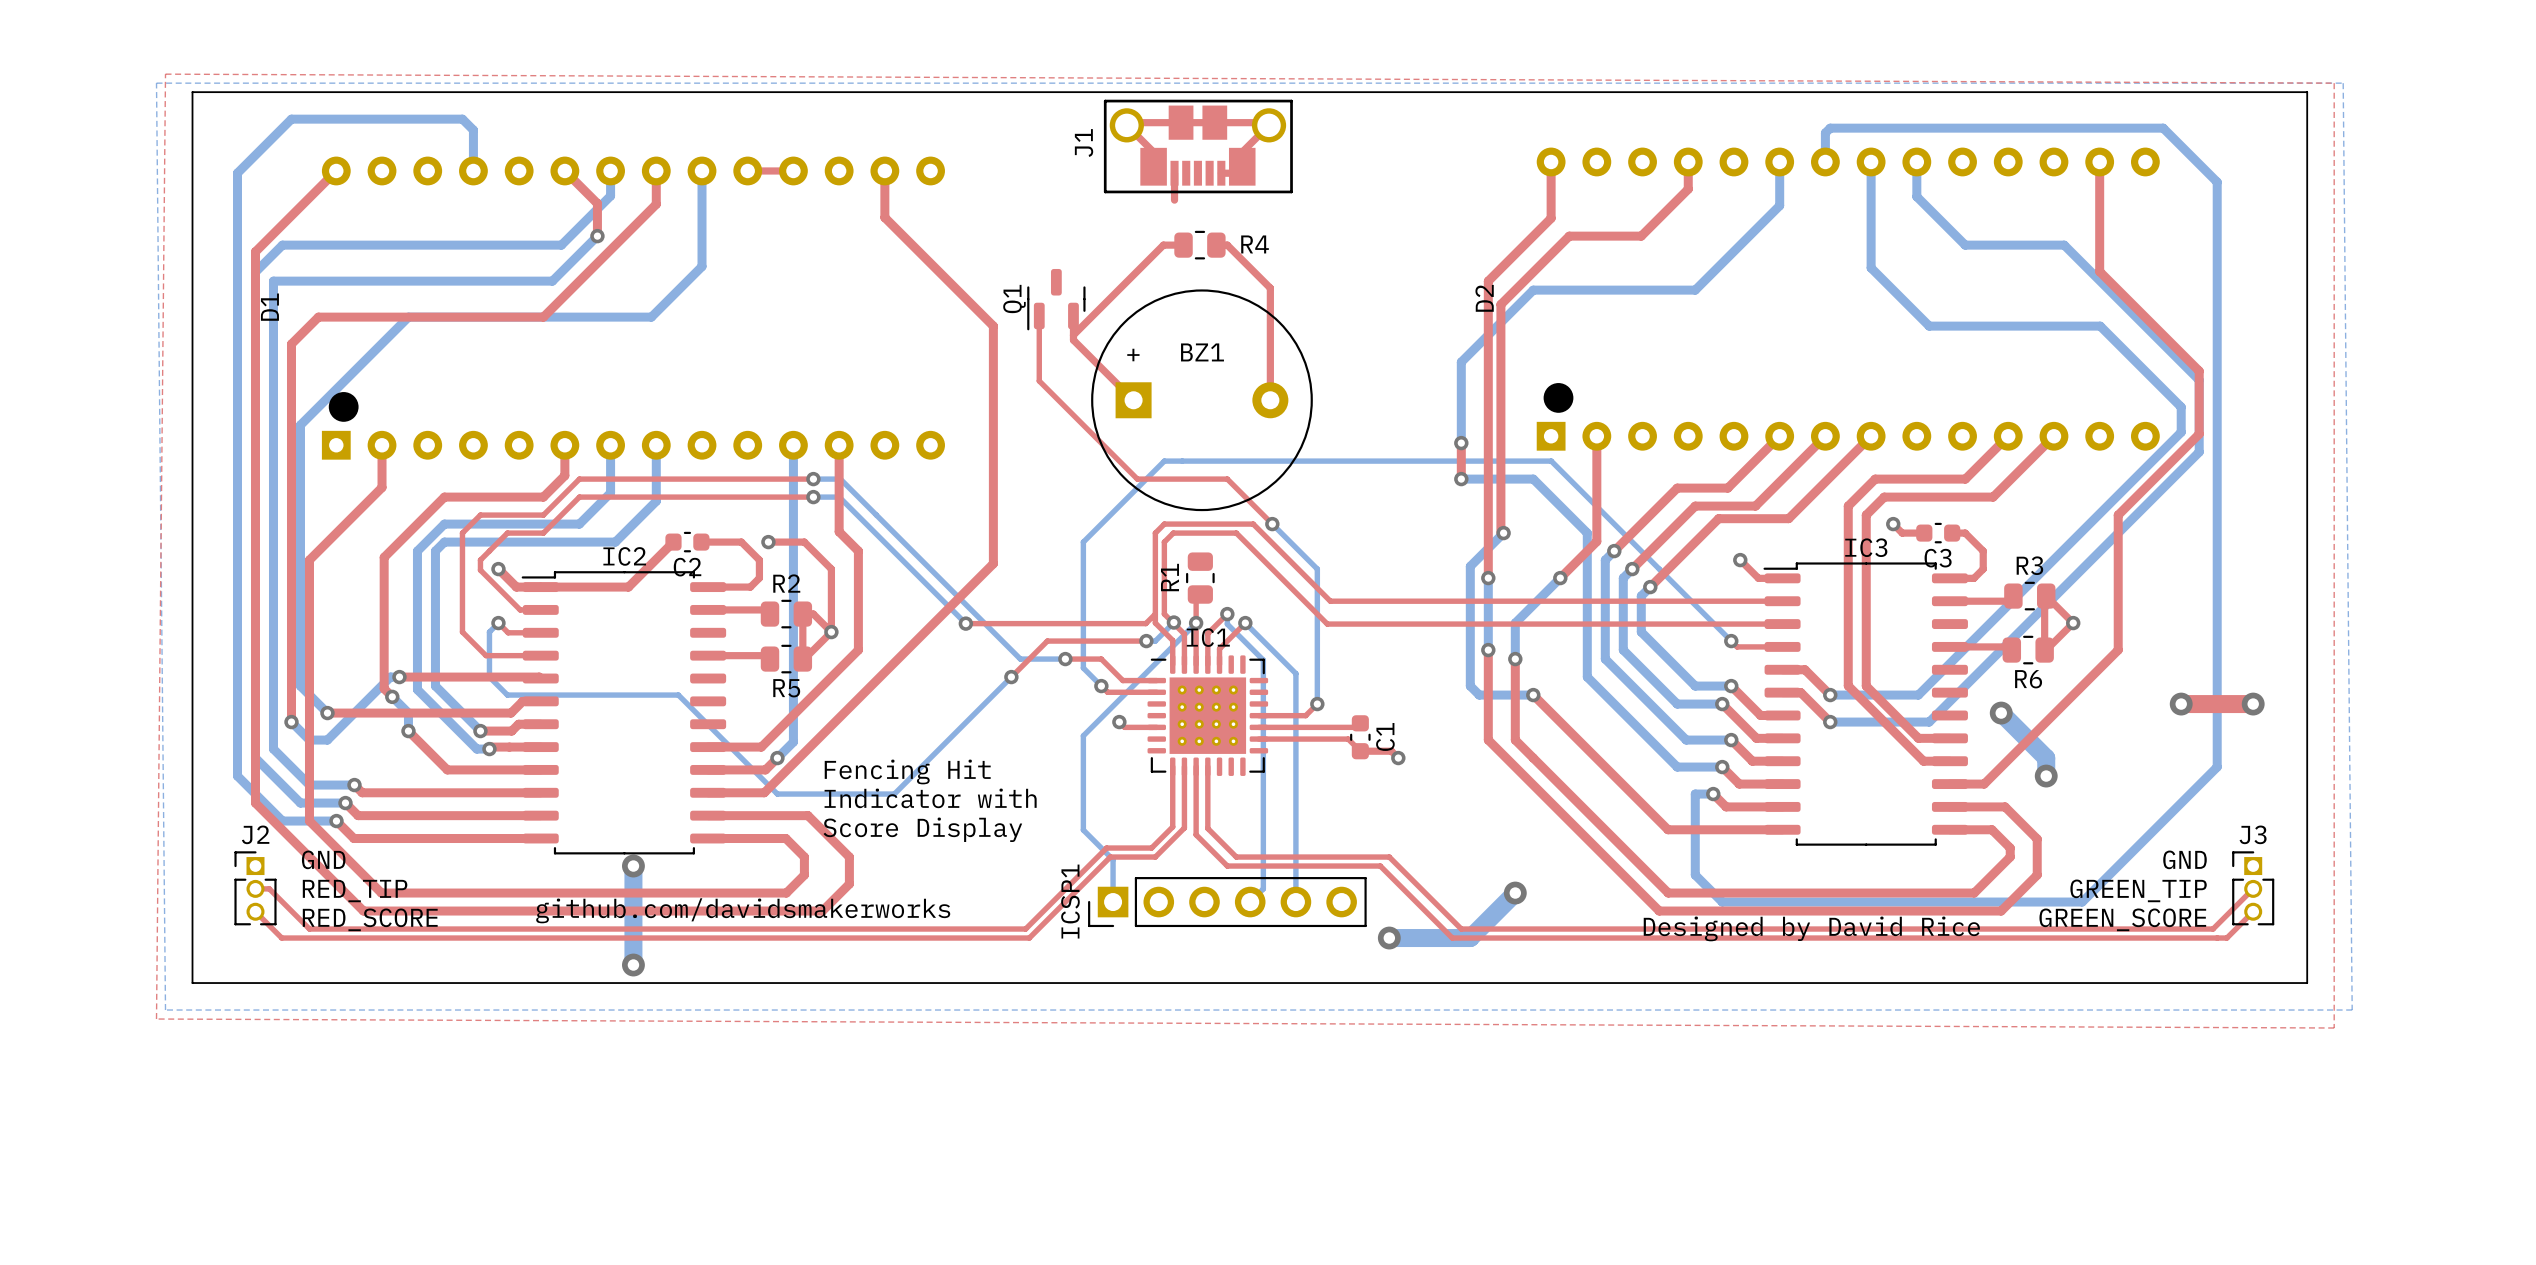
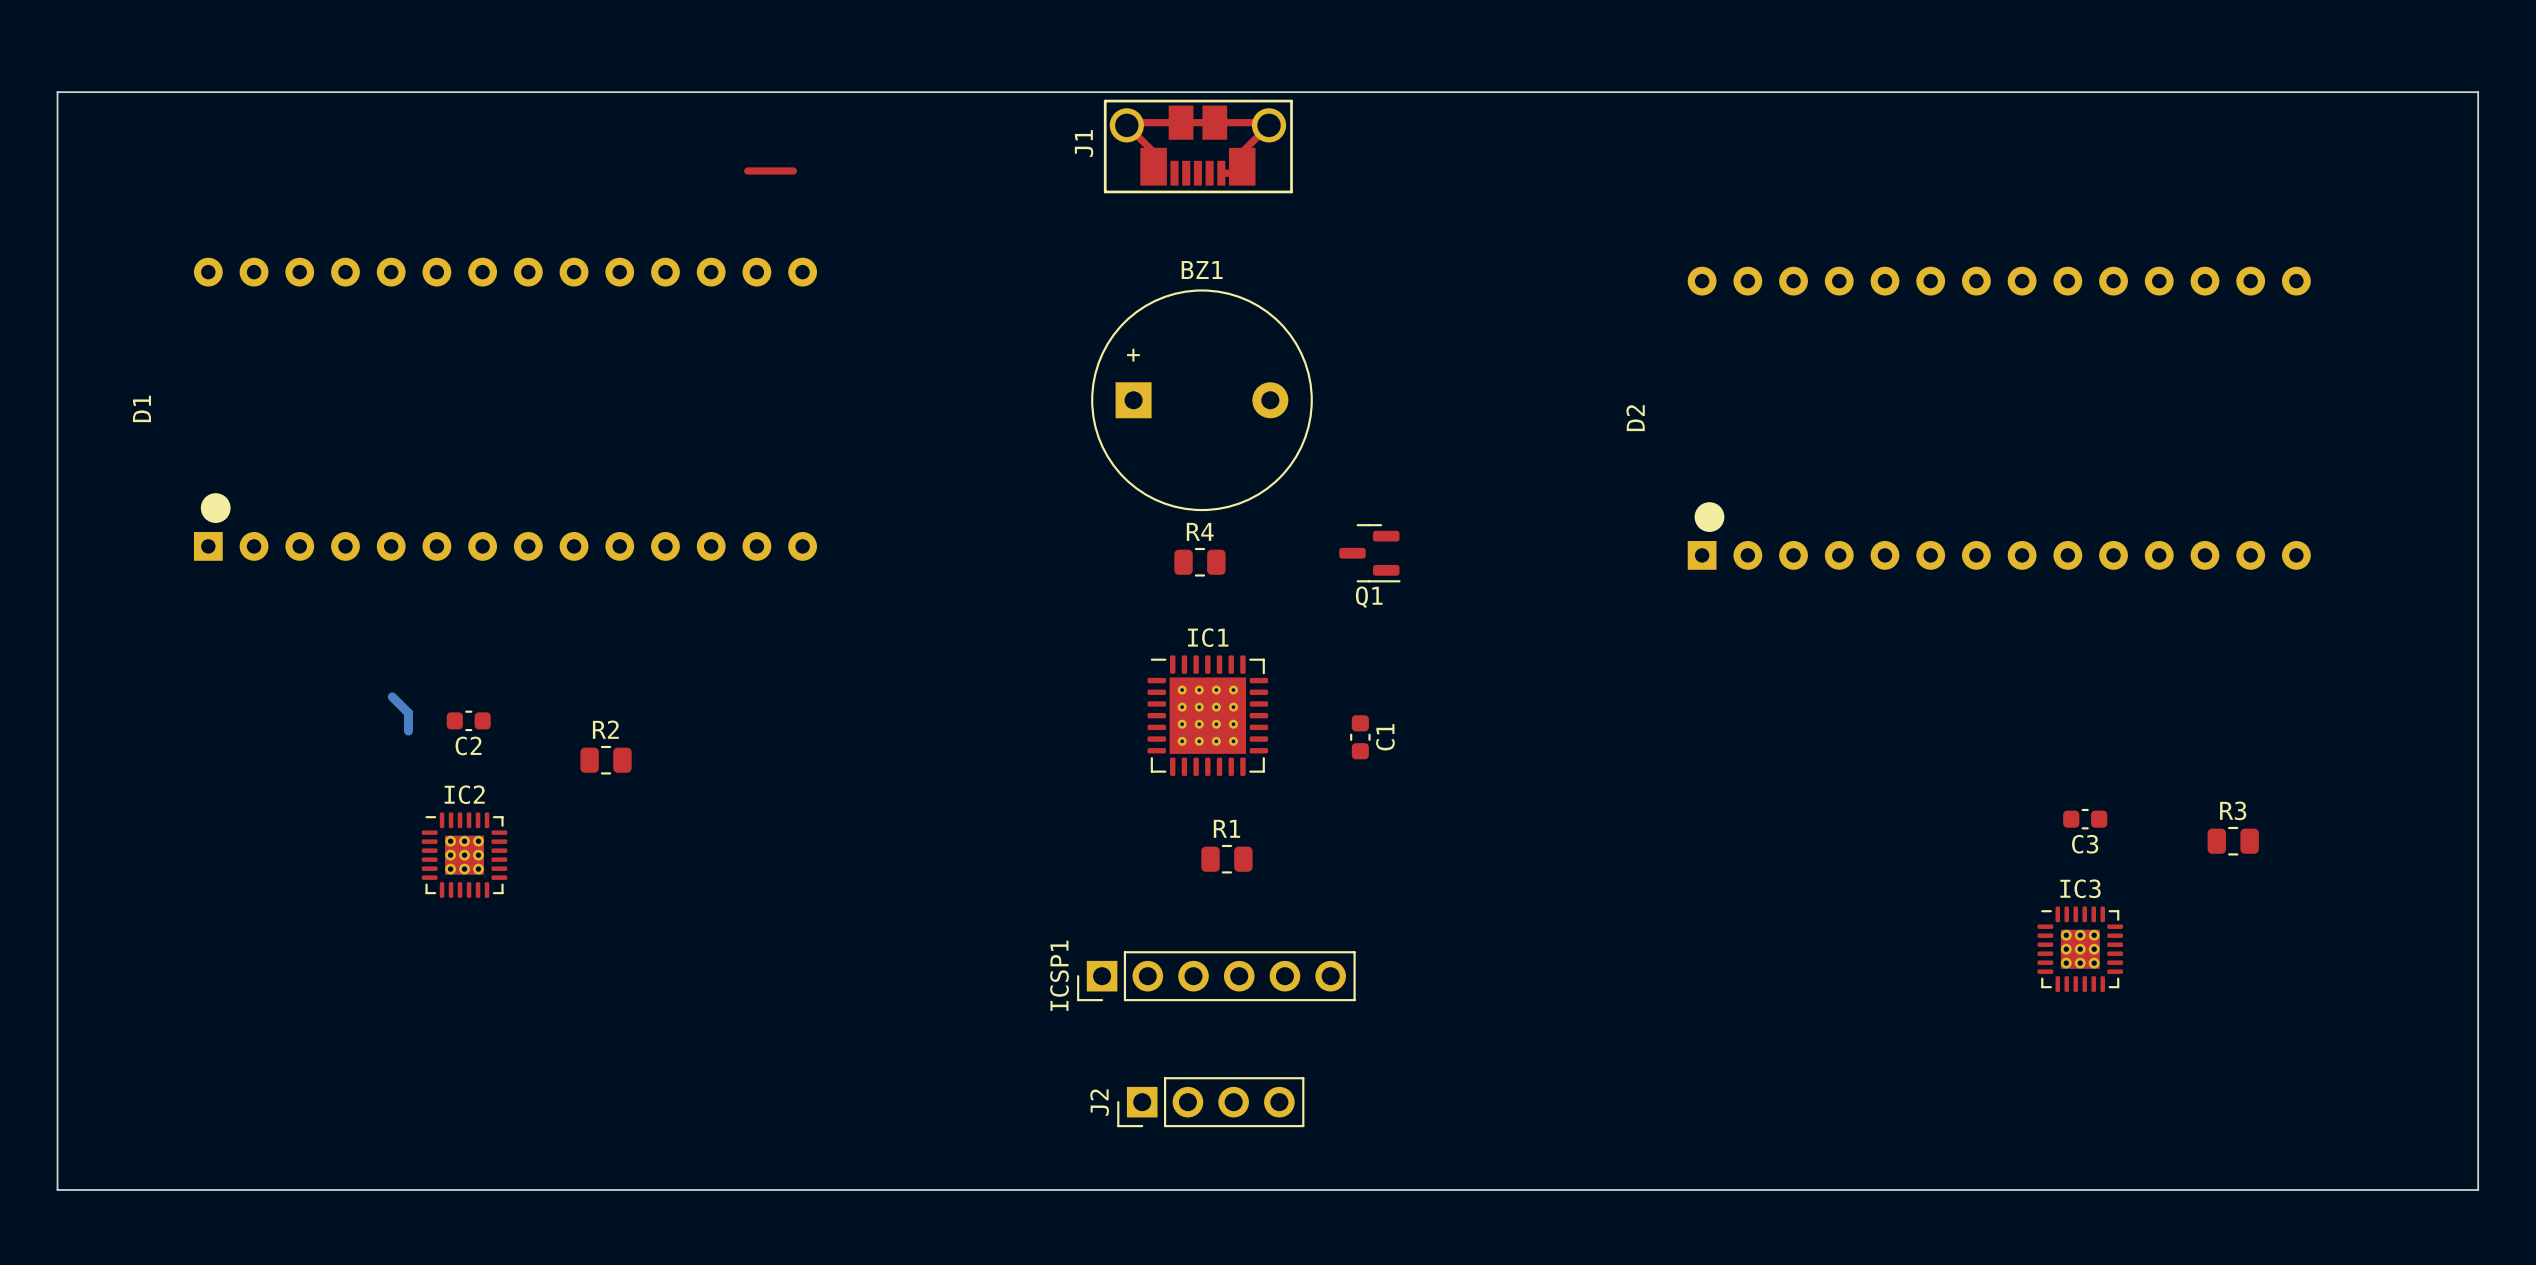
top zone outline: (165, 74) (156, 1019) (2334, 1028) (2334, 83) (165, 74) -> none
bottom zone outline: (156, 83) (2343, 83) (2352, 1010) (165, 1010) (156, 83) -> none
board edge: (192, 92) (192, 983) (2307, 983) (2307, 92) -> (192, 92) (57, 92) (57, 1189) (2478, 1189) (2478, 92) (2307, 92)
top track: (1551, 161) (1551, 218) (1488, 281) (1488, 578) -> none
top track: (1688, 161) (1688, 189) (1641, 236) (1569, 236) (1500, 304) (1500, 533) -> none
bottom track: (1779, 161) (1779, 205) (1695, 290) (1533, 290) (1461, 362) (1461, 443) -> none
bottom track: (1825, 161) (1825, 133) (1830, 128) (2163, 128) (2217, 182) (2217, 767) (2082, 902) (1722, 902) (1695, 875) (1695, 794) (1713, 794) -> none
bottom track: (1871, 161) (1871, 267) (1929, 326) (2100, 326) (2181, 407) (2181, 432) (1918, 695) (1830, 695) -> none
bottom track: (1916, 161) (1916, 196) (1965, 245) (2064, 245) (2199, 380) (2199, 452) (1929, 722) (1830, 722) -> none
top track: (2099, 161) (2099, 271) (2199, 371) (2199, 434) (2118, 515) (2118, 650) (1984, 784) (1949, 784) -> none
top track: (336, 170) (255, 251) (255, 803) (363, 911) (822, 911) (849, 884) (849, 857) (808, 815) (708, 815) -> none
bottom track: (473, 170) (473, 130) (462, 119) (291, 119) (237, 173) (237, 776) (282, 821) (336, 821) -> none
top track: (564, 170) (597, 203) (597, 236) -> none
bottom track: (610, 170) (610, 195) (561, 245) (282, 245) (255, 272) (255, 758) (300, 803) (345, 803) -> none
top track: (656, 170) (656, 204) (543, 317) (318, 317) (291, 344) (291, 722) -> none
bottom track: (702, 170) (702, 266) (651, 317) (408, 317) (300, 425) (300, 686) (327, 713) -> none
top track: (884, 170) (884, 217) (993, 326) (993, 563) (764, 792) (708, 792) -> none
top track: (1174, 173) (1174, 200) -> none
bottom track: (597, 236) (552, 281) (273, 281) (273, 749) (309, 785) (354, 785) -> none
via: (597, 236) -> none
R4 name position: R4 (1255, 244) -> R4 (1200, 531)
top track: (1183, 245) (1163, 245) (1073, 335) -> none
R4 position: (1199, 245) -> (1199, 562)
top track: (1216, 245) (1227, 245) (1270, 288) (1270, 400) -> none
Q1 rotation: 0° (1056, 299) -> 90° counterclockwise (1369, 553)
Q1 position: (1056, 299) -> (1369, 553)
D2 position: (1848, 299) -> (1999, 418)
D1 position: (633, 308) -> (505, 409)
top track: (1039, 315) (1039, 381) (1137, 479) (1227, 479) (1272, 524) -> none
top track: (1073, 315) (1073, 340) (1133, 400) -> none
BZ1 name position: BZ1 (1202, 352) -> BZ1 (1202, 270)
top track: (1596, 436) (1596, 541) (1560, 578) -> none
top track: (1779, 436) (1727, 488) (1677, 488) (1614, 551) -> none
top track: (1825, 436) (1755, 506) (1695, 506) (1632, 569) -> none
top track: (1871, 436) (1788, 518) (1718, 518) (1650, 587) -> none
top track: (2008, 436) (1965, 479) (1875, 479) (1848, 506) (1848, 685) (1923, 761) (1949, 761) -> none
top track: (2053, 436) (1993, 497) (1884, 497) (1866, 515) (1866, 686) (1918, 738) (1949, 738) -> none
top track: (1461, 443) (1461, 479) -> none
via: (1461, 443) -> none
top track: (382, 445) (382, 487) (309, 560) (309, 821) (381, 893) (786, 893) (804, 875) (804, 857) (785, 838) (708, 838) -> none
top track: (564, 445) (564, 475) (543, 497) (444, 497) (384, 557) (384, 688) (392, 696) -> none
bottom track: (610, 445) (610, 492) (579, 524) (444, 524) (417, 551) (417, 689) (476, 749) (489, 749) -> none
bottom track: (656, 445) (656, 501) (615, 542) (444, 542) (435, 551) (435, 686) (480, 731) -> none
bottom track: (793, 445) (793, 742) (777, 758) -> none
top track: (839, 445) (839, 531) (858, 551) (858, 650) (761, 747) (708, 747) -> none
top track: (813, 479) (579, 479) (543, 515) (480, 515) (462, 533) (462, 632) (486, 655) (540, 655) -> none
bottom track: (813, 479) (840, 479) (1020, 659) (1065, 659) -> none
via: (813, 479) -> none
bottom track: (1461, 479) (1533, 479) (1587, 533) (1587, 677) (1677, 767) (1722, 767) -> none
via: (1461, 479) -> none
top track: (813, 497) (579, 497) (543, 533) (507, 533) (480, 560) (480, 570) (520, 609) (540, 609) -> none
bottom track: (813, 497) (839, 497) (965, 623) -> none
via: (813, 497) -> none
bottom track: (1272, 524) (1317, 569) (1317, 704) -> none
via: (1272, 524) -> none
top track: (1893, 524) (1902, 533) (1924, 533) -> none
via: (1893, 524) -> none
bottom track: (1503, 533) (1470, 566) (1470, 686) (1479, 695) (1533, 695) -> none
via: (1503, 533) -> none
C3 position: (1938, 533) -> (2085, 819)
top track: (1952, 533) (1965, 533) (1983, 551) (1983, 569) (1973, 578) (1949, 578) -> none
top track: (673, 542) (628, 587) (516, 587) (498, 569) -> none
C2 position: (687, 542) -> (468, 720)
top track: (701, 542) (741, 542) (759, 560) (759, 578) (750, 587) (708, 587) -> none
top track: (768, 542) (804, 542) (831, 569) (831, 632) -> none
via: (768, 542) -> none
IC3 name position: IC3 (1866, 547) -> IC3 (2080, 888)
bottom track: (1614, 551) (1605, 560) (1605, 659) (1686, 740) (1731, 740) -> none
via: (1614, 551) -> none
IC2 name position: IC2 (624, 556) -> IC2 (464, 794)
top track: (1740, 560) (1758, 578) (1782, 578) -> none
via: (1740, 560) -> none
IC3 footprint: [1763, 562, 1968, 846] -> [2037, 906, 2123, 992]
via: (498, 569) -> none
bottom track: (1632, 569) (1623, 578) (1623, 650) (1677, 704) (1722, 704) -> none
via: (1632, 569) -> none
IC2 footprint: [521, 571, 727, 855] -> [421, 812, 508, 898]
R1 rotation: 0° (1200, 578) -> 90° clockwise (1226, 859)
R1 position: (1200, 578) -> (1226, 859)
bottom track: (1488, 578) (1488, 650) -> none
via: (1488, 578) -> none
bottom track: (1560, 578) (1515, 623) (1515, 659) -> none
via: (1560, 578) -> none
bottom track: (1650, 587) (1641, 596) (1641, 632) (1695, 686) (1731, 686) -> none
via: (1650, 587) -> none
top track: (1200, 594) (1196, 598) (1196, 664) -> none
top track: (2013, 596) (2008, 601) (1949, 601) -> none
R3 position: (2029, 596) -> (2233, 841)
top track: (2046, 596) (2044, 597) (2044, 650) (2073, 623) (2046, 596) -> none
top track: (1782, 601) (1330, 601) (1253, 524) (1164, 524) (1155, 533) (1155, 623) (1172, 640) (1172, 664) -> none
top track: (708, 609) (765, 609) (769, 614) -> none
R2 position: (786, 614) -> (606, 760)
top track: (1155, 614) (1145, 623) (965, 623) -> none
top track: (1227, 614) (1207, 633) (1207, 664) -> none
bottom track: (1227, 614) (1227, 624) (1263, 660) (1263, 888) (1250, 902) -> none
via: (1227, 614) -> none
bottom track: (1173, 622) (1155, 641) (1146, 641) -> none
via: (1173, 622) -> none
top track: (498, 623) (508, 632) (540, 632) -> none
bottom track: (498, 623) (489, 632) (489, 677) (507, 695) (678, 695) (777, 794) (894, 794) (1011, 677) -> none
via: (498, 623) -> none
via: (965, 623) -> none
bottom track: (1196, 623) (1083, 735) (1083, 830) (1113, 859) (1113, 902) -> none
via: (1196, 623) -> none
top track: (1245, 623) (1219, 648) (1219, 664) -> none
bottom track: (1245, 623) (1295, 673) (1295, 902) -> none
via: (1245, 623) -> none
via: (2073, 623) -> none
top track: (1782, 624) (1327, 624) (1236, 533) (1173, 533) (1164, 542) (1164, 614) (1184, 634) (1184, 664) -> none
top track: (831, 632) (804, 659) (802, 659) (802, 614) (813, 614) (831, 632) -> none
via: (831, 632) -> none
top track: (1146, 641) (1047, 641) (1011, 677) -> none
via: (1146, 641) -> none
top track: (1731, 641) (1737, 646) (1782, 646) -> none
bottom track: (1731, 641) (1551, 461) (1164, 461) (1083, 542) (1083, 668) (1101, 686) -> none
via: (1731, 641) -> none
top track: (1949, 646) (2008, 646) (2011, 650) -> none
top track: (1488, 650) (1488, 740) (1659, 911) (2001, 911) (2037, 875) (2037, 839) (2005, 806) (1949, 806) -> none
via: (1488, 650) -> none
R6: (2028, 650) -> none
top track: (708, 655) (766, 655) (769, 659) -> none
R5: (786, 659) -> none
top track: (1065, 659) (1101, 659) (1122, 680) (1156, 680) -> none
via: (1065, 659) -> none
top track: (1515, 659) (1515, 740) (1668, 893) (1974, 893) (2010, 857) (2010, 848) (1991, 829) (1949, 829) -> none
via: (1515, 659) -> none
top track: (1782, 669) (1804, 669) (1830, 695) -> none
top track: (399, 677) (540, 678) -> none
bottom track: (399, 677) (390, 677) (327, 740) (309, 740) (291, 722) -> none
via: (399, 677) -> none
via: (1011, 677) -> none
top track: (1101, 686) (1107, 692) (1156, 692) -> none
via: (1101, 686) -> none
top track: (1731, 686) (1760, 715) (1782, 715) -> none
via: (1731, 686) -> none
top track: (1782, 692) (1800, 692) (1830, 722) -> none
top track: (1533, 695) (1668, 829) (1782, 829) -> none
via: (1533, 695) -> none
via: (1830, 695) -> none
via: (392, 696) -> none
top track: (540, 701) (522, 701) (511, 713) (327, 713) -> none
top track: (1317, 704) (1305, 715) (1258, 715) -> none
via: (1317, 704) -> none
top track: (1722, 704) (1756, 738) (1782, 738) -> none
via: (1722, 704) -> none
top track: (2181, 704) (2253, 704) -> none
via: (2181, 704) -> none
via: (2253, 704) -> none
via: (327, 713) -> none
bottom track: (2001, 713) (2046, 758) (2046, 776) -> none
via: (2001, 713) -> none
via: (291, 722) -> none
top track: (1119, 722) (1124, 727) (1156, 727) -> none
via: (1119, 722) -> none
via: (1830, 722) -> none
top track: (1360, 723) (1356, 727) (1258, 727) -> none
top track: (540, 724) (518, 724) (511, 731) (480, 731) -> none
top track: (408, 731) (447, 769) (540, 769) -> none
via: (408, 731) -> none
via: (480, 731) -> none
top track: (1258, 739) (1348, 739) (1360, 751) (1391, 751) (1398, 758) -> none
top track: (1731, 740) (1752, 761) (1782, 761) -> none
via: (1731, 740) -> none
top track: (540, 747) (491, 747) (489, 749) -> none
via: (489, 749) -> none
top track: (777, 758) (765, 769) (708, 769) -> none
via: (777, 758) -> none
via: (1398, 758) -> none
top track: (1172, 766) (1172, 826) (1151, 848) (1106, 848) (1025, 929) (309, 929) (269, 888) (255, 888) -> none
top track: (1184, 766) (1184, 827) (1155, 857) (1110, 857) (1029, 938) (281, 938) (255, 911) -> none
top track: (1196, 766) (1196, 834) (1227, 866) (1380, 866) (1452, 938) (2226, 938) (2253, 911) -> none
top track: (1207, 766) (1207, 828) (1236, 857) (1389, 857) (1461, 929) (2213, 929) (2253, 888) -> none
top track: (1722, 767) (1739, 784) (1782, 784) -> none
via: (1722, 767) -> none
text: Fencing Hit (907, 771) -> none
via: (2046, 776) -> none
top track: (354, 785) (362, 792) (540, 792) -> none
via: (354, 785) -> none
top track: (1713, 794) (1726, 806) (1782, 806) -> none
via: (1713, 794) -> none
text: Indicator with (930, 798) -> none
top track: (345, 803) (358, 815) (540, 815) -> none
via: (345, 803) -> none
top track: (336, 821) (353, 838) (540, 838) -> none
via: (336, 821) -> none
text: Score Display (922, 829) -> none
J2 name position: J2 (255, 834) -> J2 (1099, 1102)
J2 footprint: [234, 851, 277, 926] -> [1117, 1077, 1305, 1128]
text: GND (323, 859) -> none
text: GND (2185, 859) -> none
bottom track: (633, 866) (633, 965) -> none
via: (633, 866) -> none
J3: (2253, 888) -> none
text: GREEN_TIP (2138, 890) -> none
text: RED_TIP (355, 891) -> none
bottom track: (1515, 893) (1470, 938) (1389, 938) -> none
via: (1515, 893) -> none
ICSP1 position: (1227, 902) -> (1216, 976)
text: github.com/davidsmakerworks (743, 910) -> none
text: RED_SCORE (370, 919) -> none
text: GREEN_SCORE (2122, 919) -> none
text: Designed by David Rice (1811, 928) -> none
via: (1389, 938) -> none
via: (633, 965) -> none

